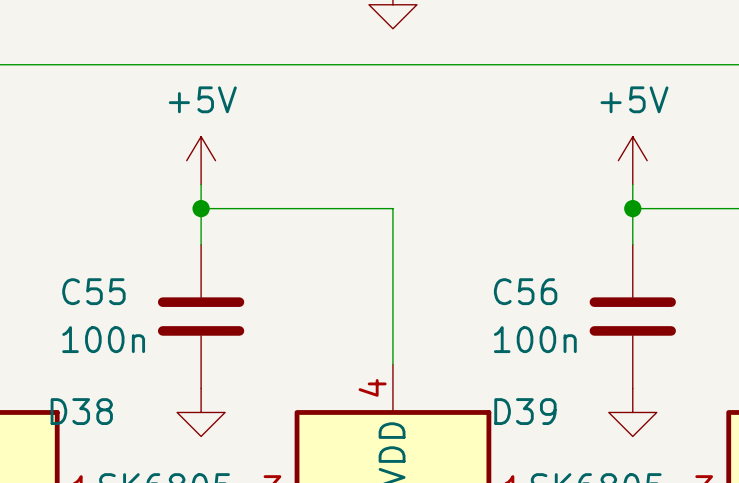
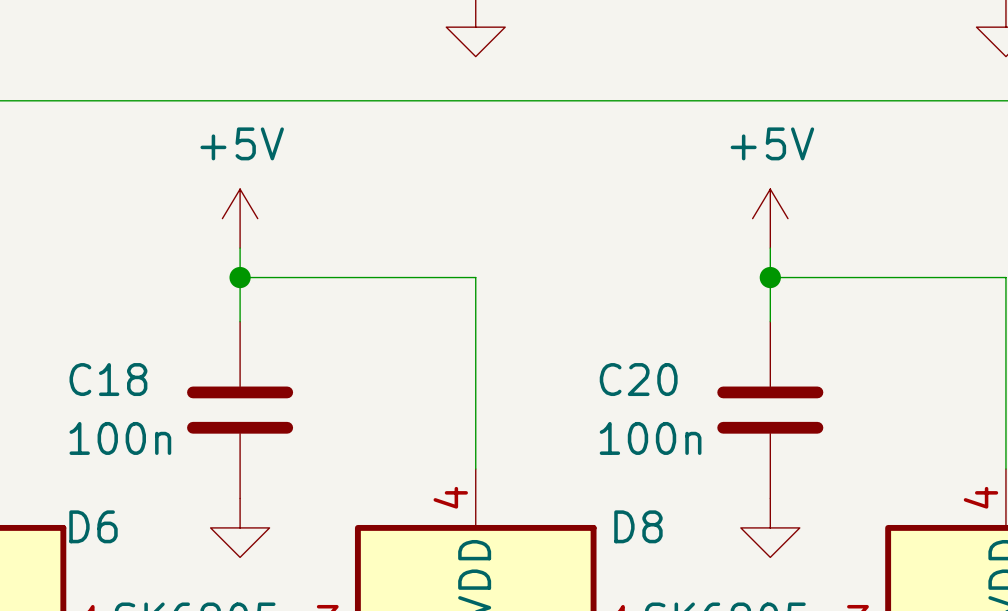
C55 name: C55 (93, 291) -> C18 (108, 379)
C56 name: C56 (525, 291) -> C20 (638, 379)
D38 name: D38 (81, 411) -> D6 (93, 526)
D39 name: D39 (525, 411) -> D8 (638, 526)

